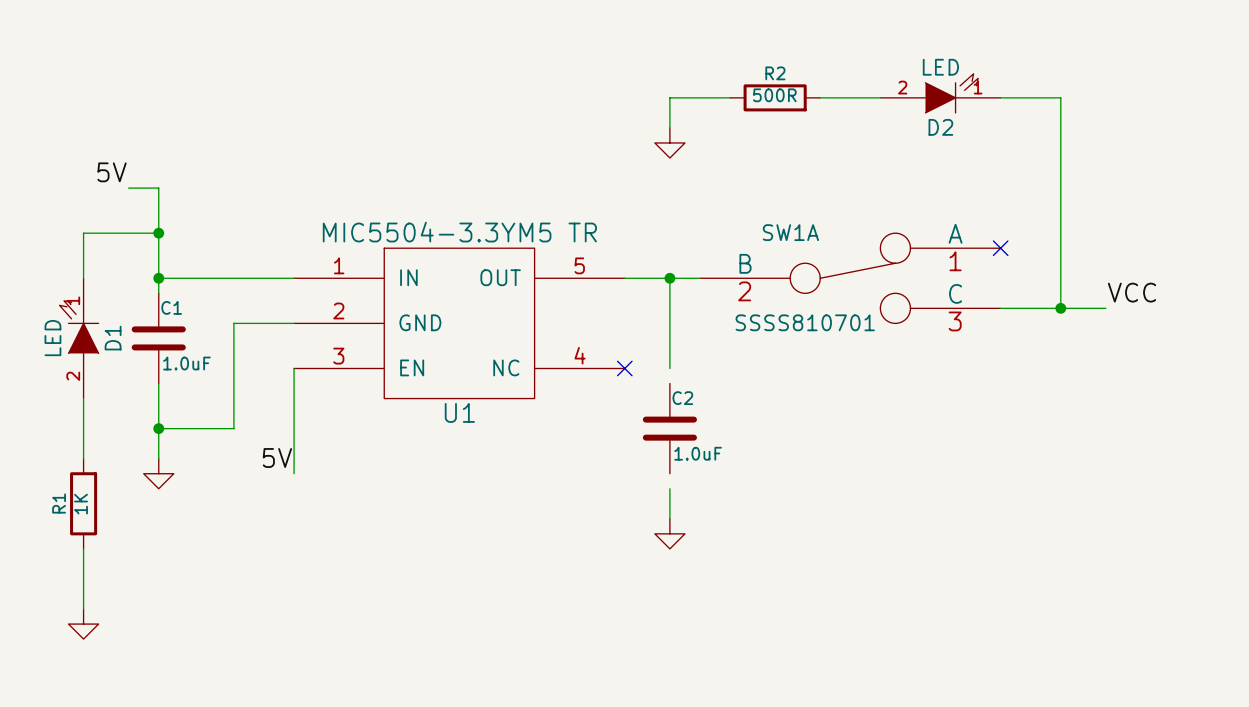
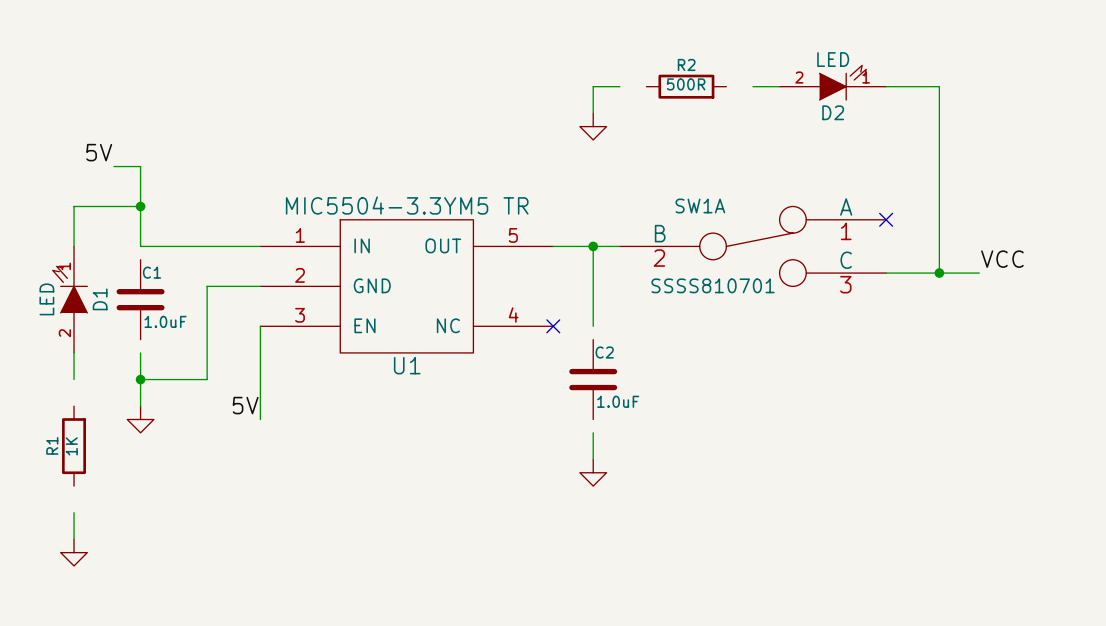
wire: (699, 97) (730, 97) -> none
wire: (820, 97) (850, 97) -> none
wire: (158, 278) (158, 293) -> none
junction: (158, 278) -> none
wire: (158, 383) (158, 398) -> none
wire: (83, 428) (83, 458) -> none
wire: (83, 548) (83, 578) -> none

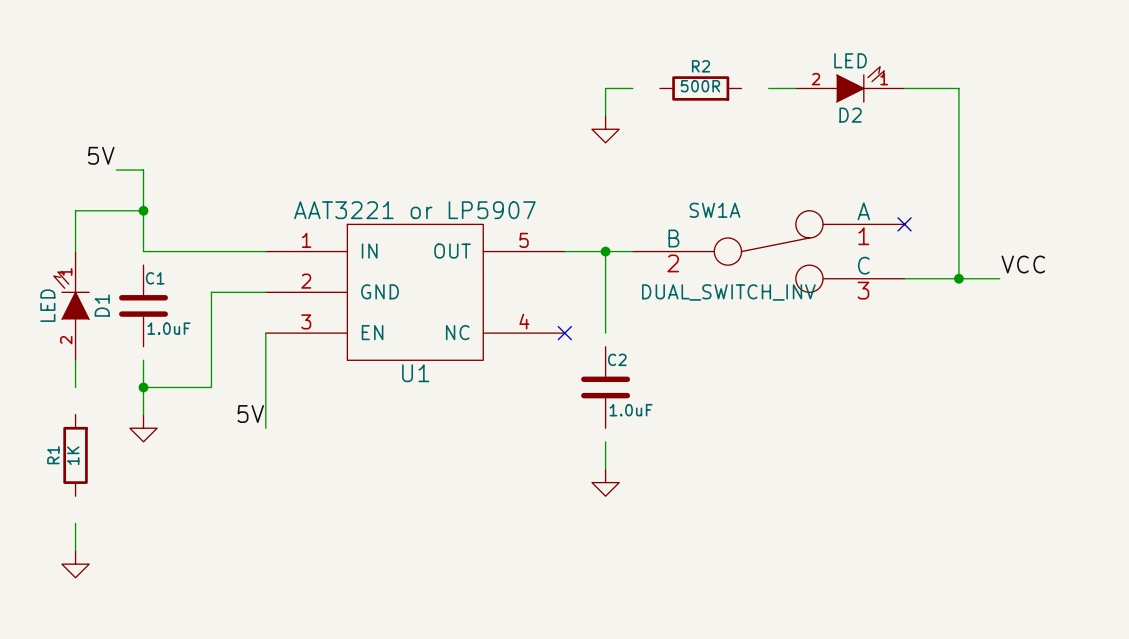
U1 value: MIC5504-3.3YM5 TR (407, 205) -> AAT3221 or LP5907 (414, 210)
SW1A value: SSSS810701 (713, 285) -> DUAL_SWITCH_INV (728, 292)

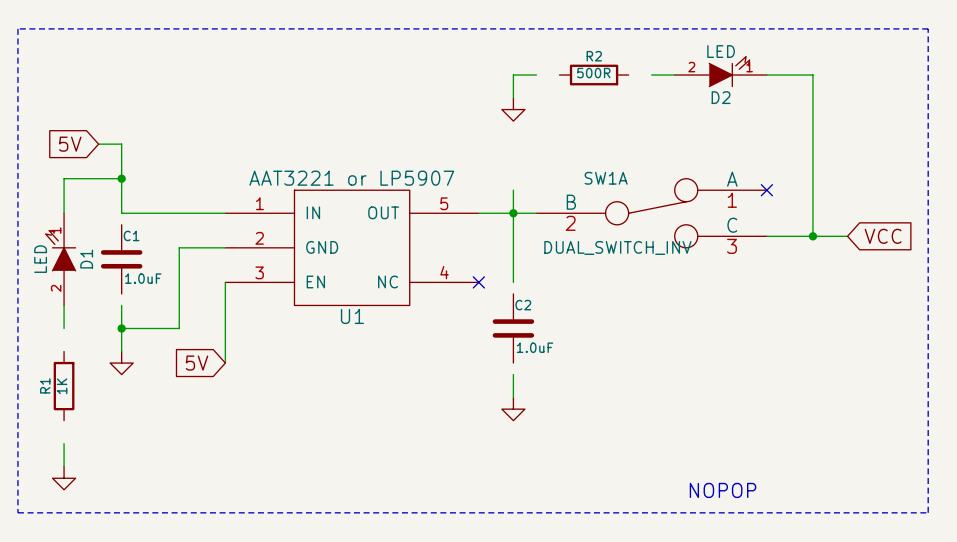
line: none -> (17, 28) (928, 28) (928, 512) (17, 512) (17, 28)
label: 5V (101, 155) -> none
global label: none -> 5V (70, 144)
wire: none -> (513, 190) (513, 213)
label: VCC (1023, 264) -> none
global label: none -> VCC (883, 236)
label: 5V (250, 414) -> none
global label: none -> 5V (197, 363)
text: none -> NOPOP (723, 490)

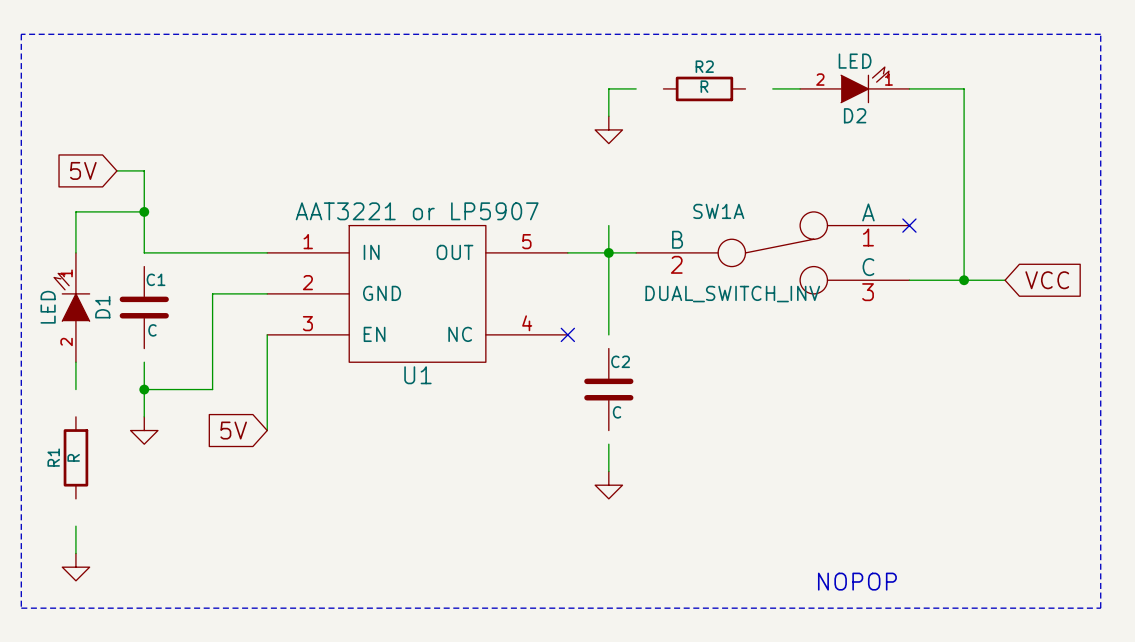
R2 value: 500R (593, 73) -> R (704, 86)
C1 value: 1.0uF (143, 278) -> C (152, 330)
C2 value: 1.0uF (535, 347) -> C (617, 412)
R1 value: 1K (62, 386) -> R (73, 457)

